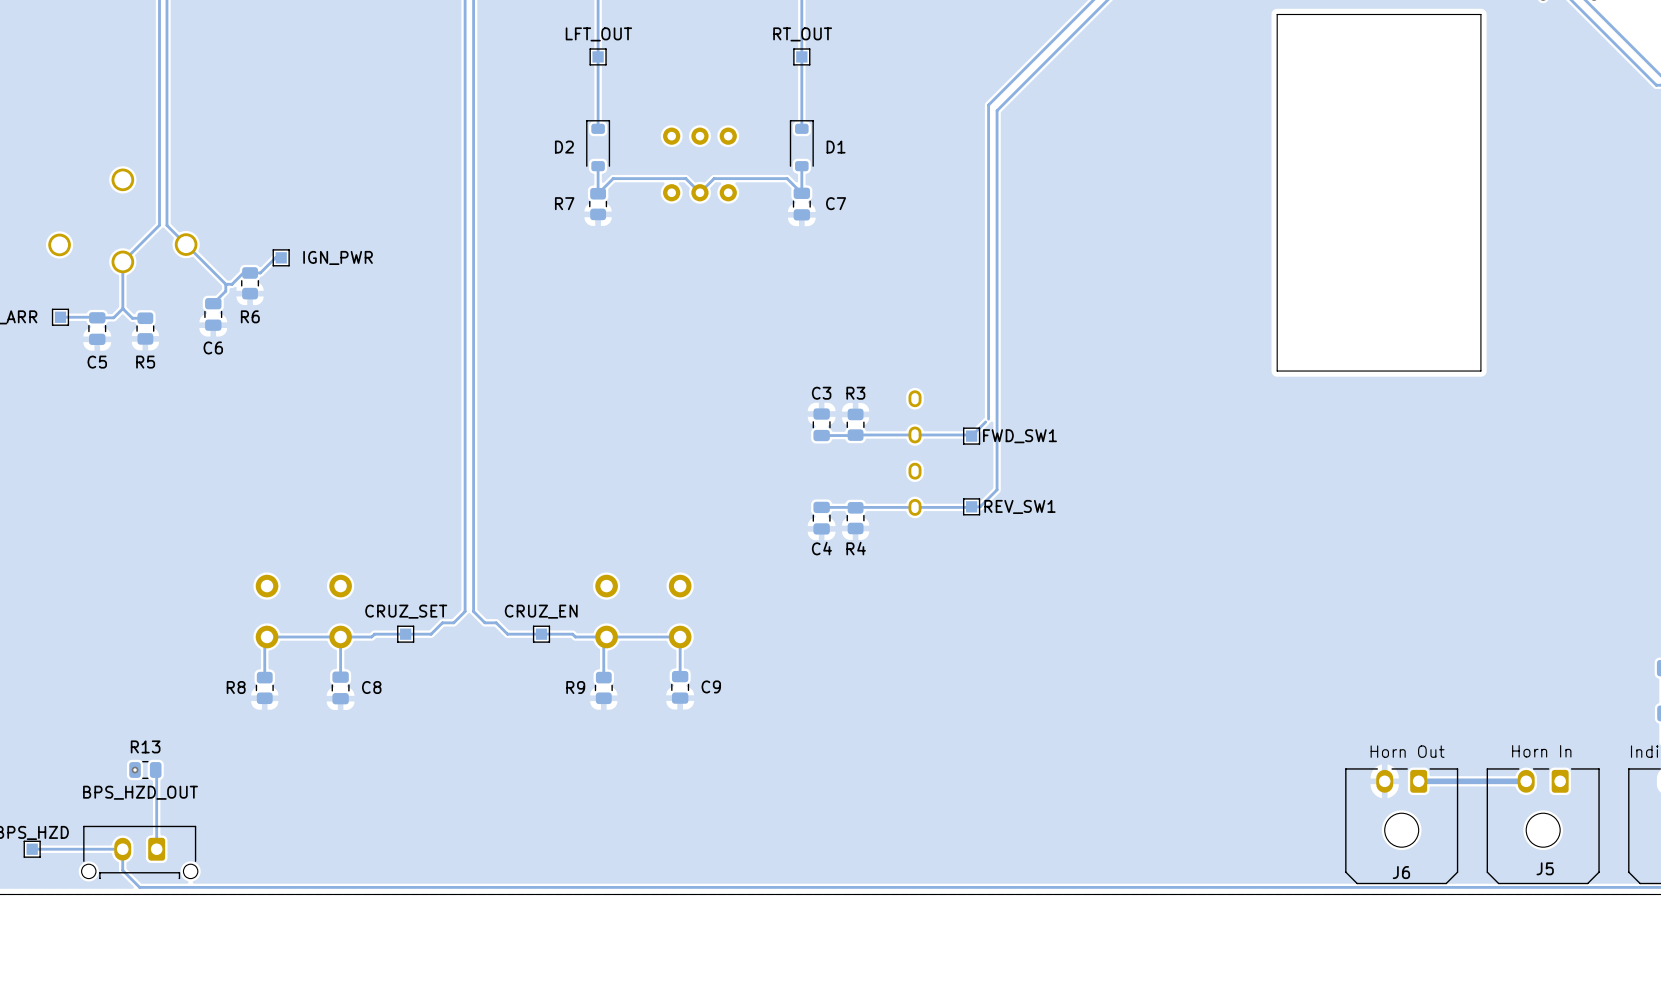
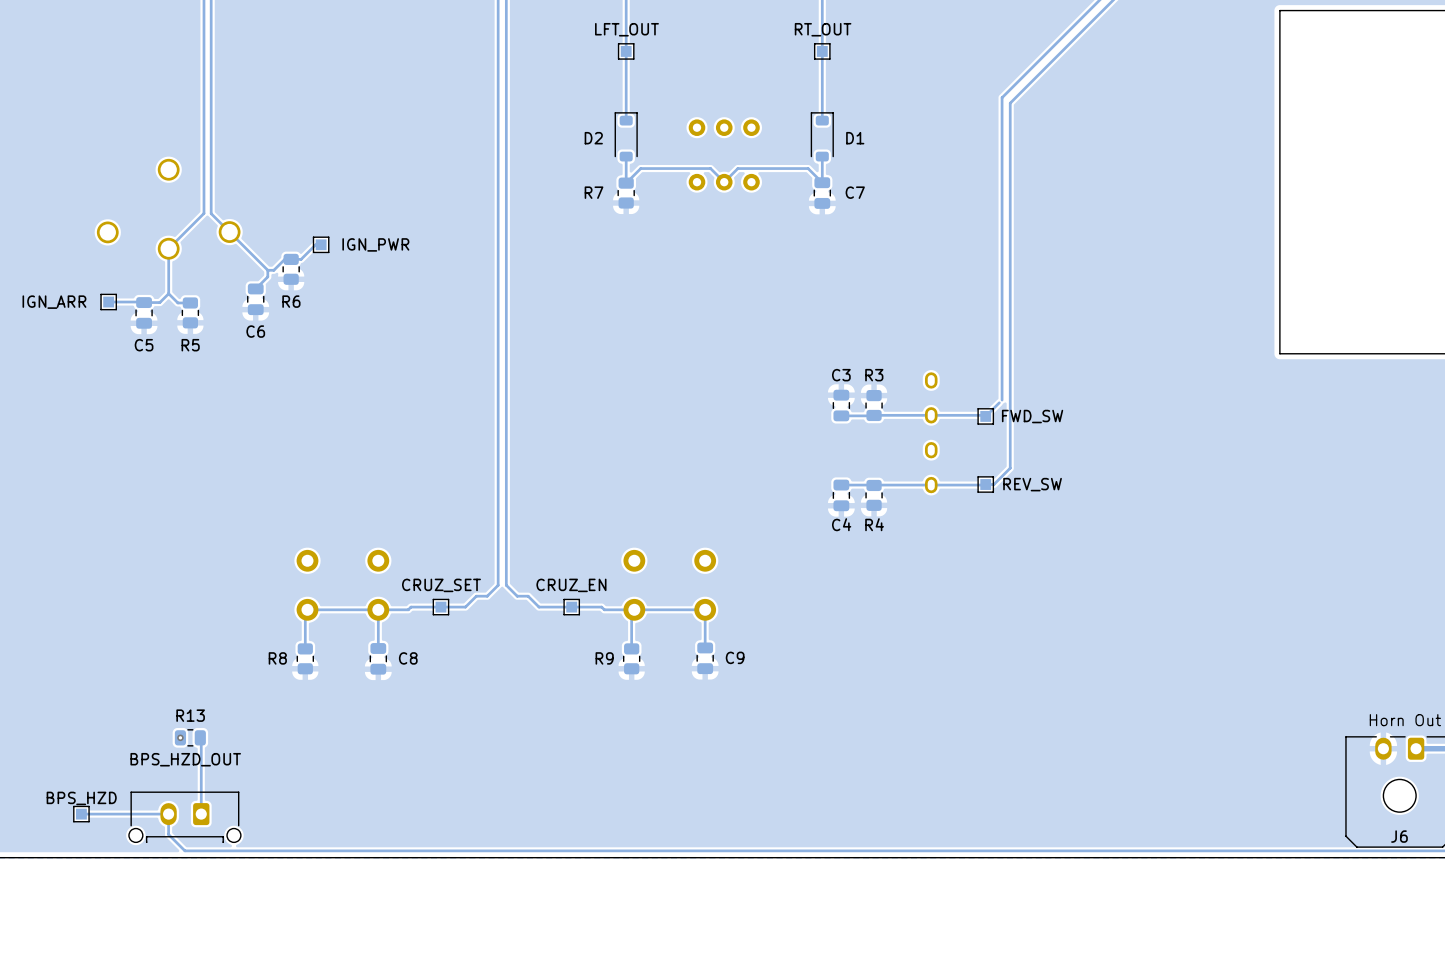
FWD_SW1 name: FWD_SW1 (1019, 436) -> FWD_SW (1032, 416)
REV_SW1 name: REV_SW1 (1019, 506) -> REV_SW (1032, 484)

